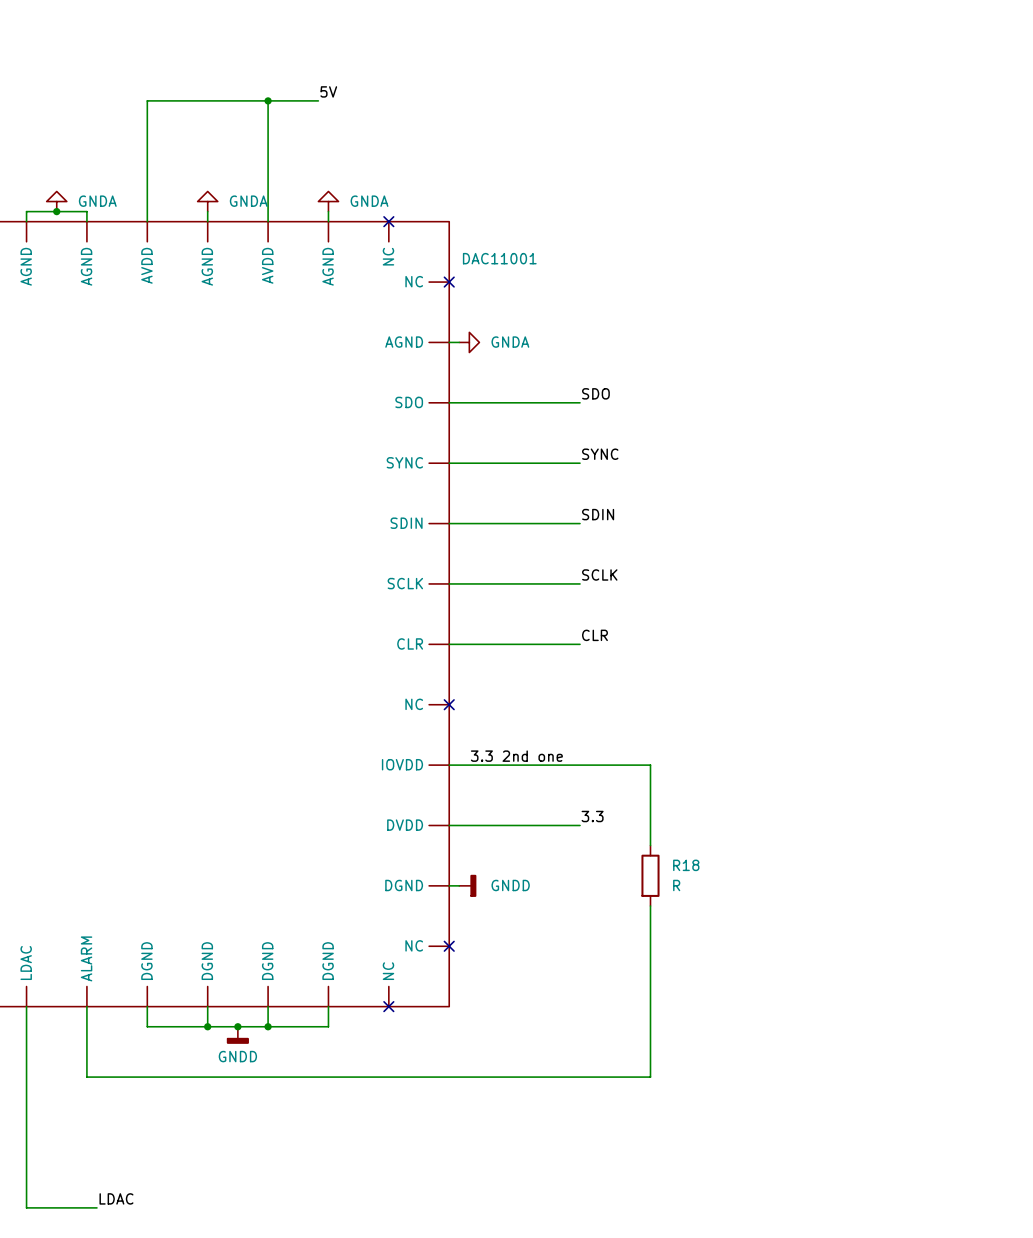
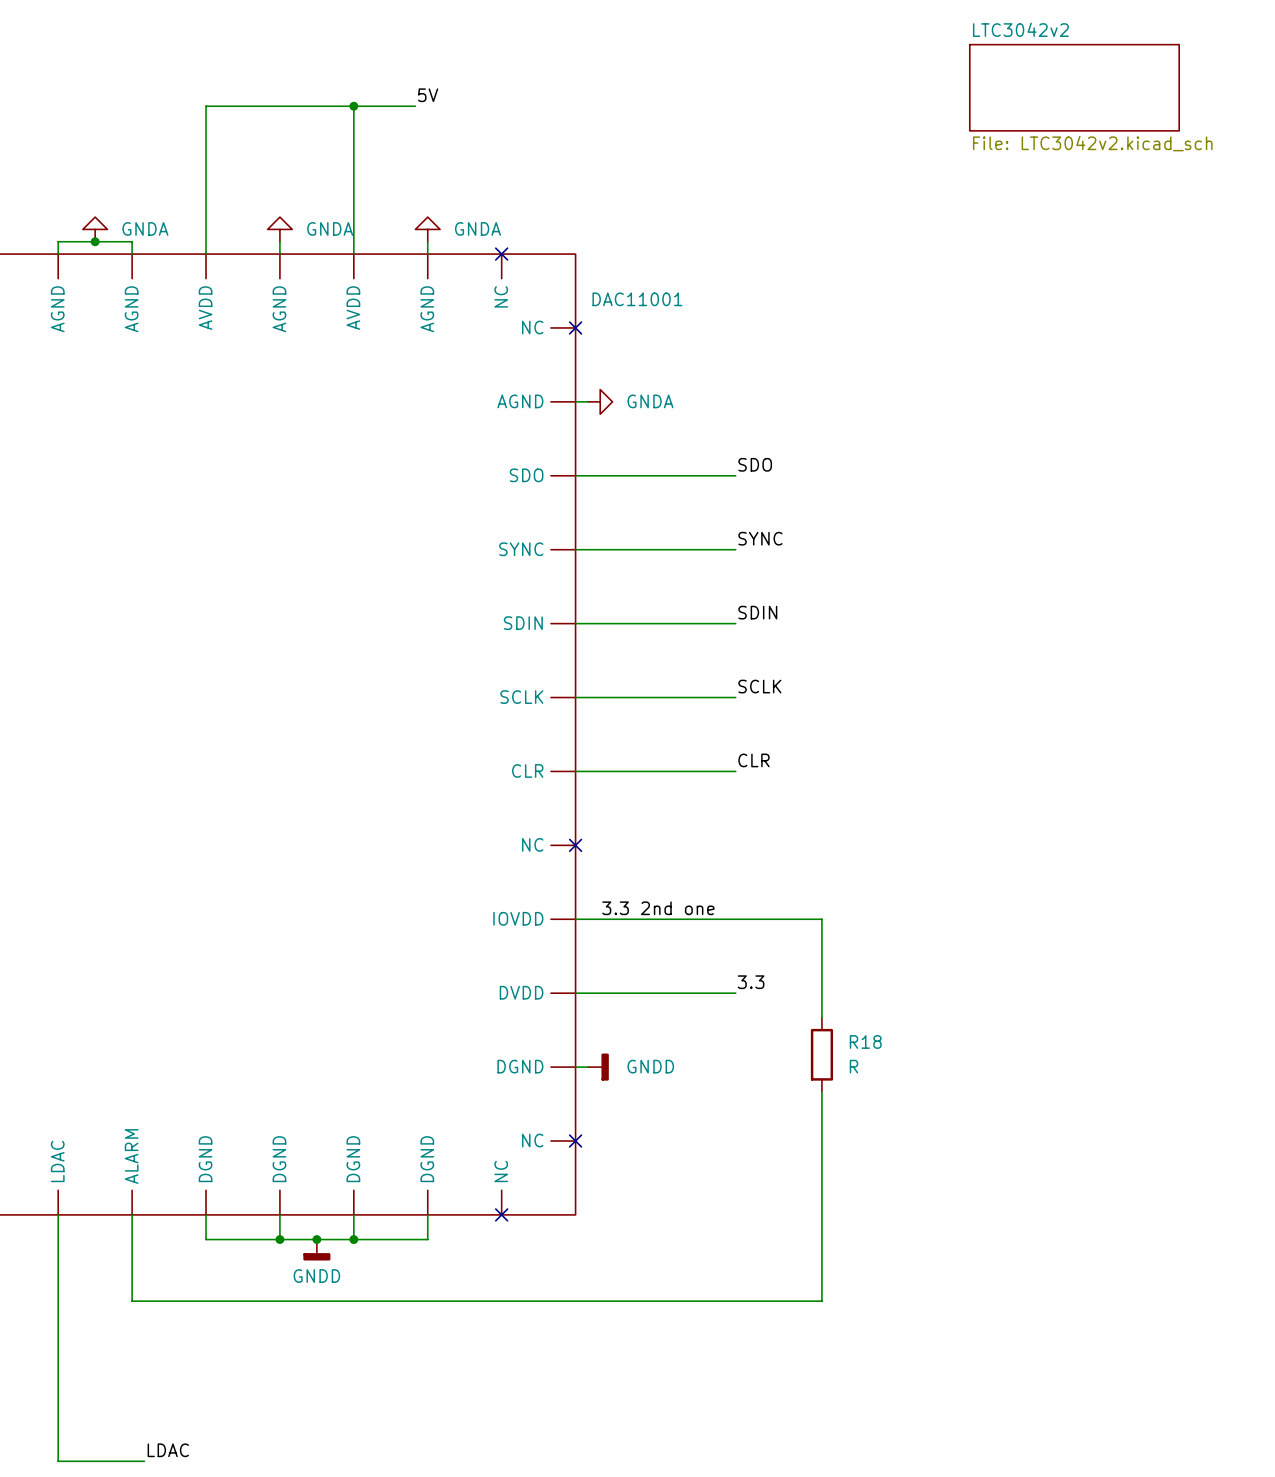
sheet LTC3042v2: none -> File: LTC3042v2.kicad_sch (1074, 87)

